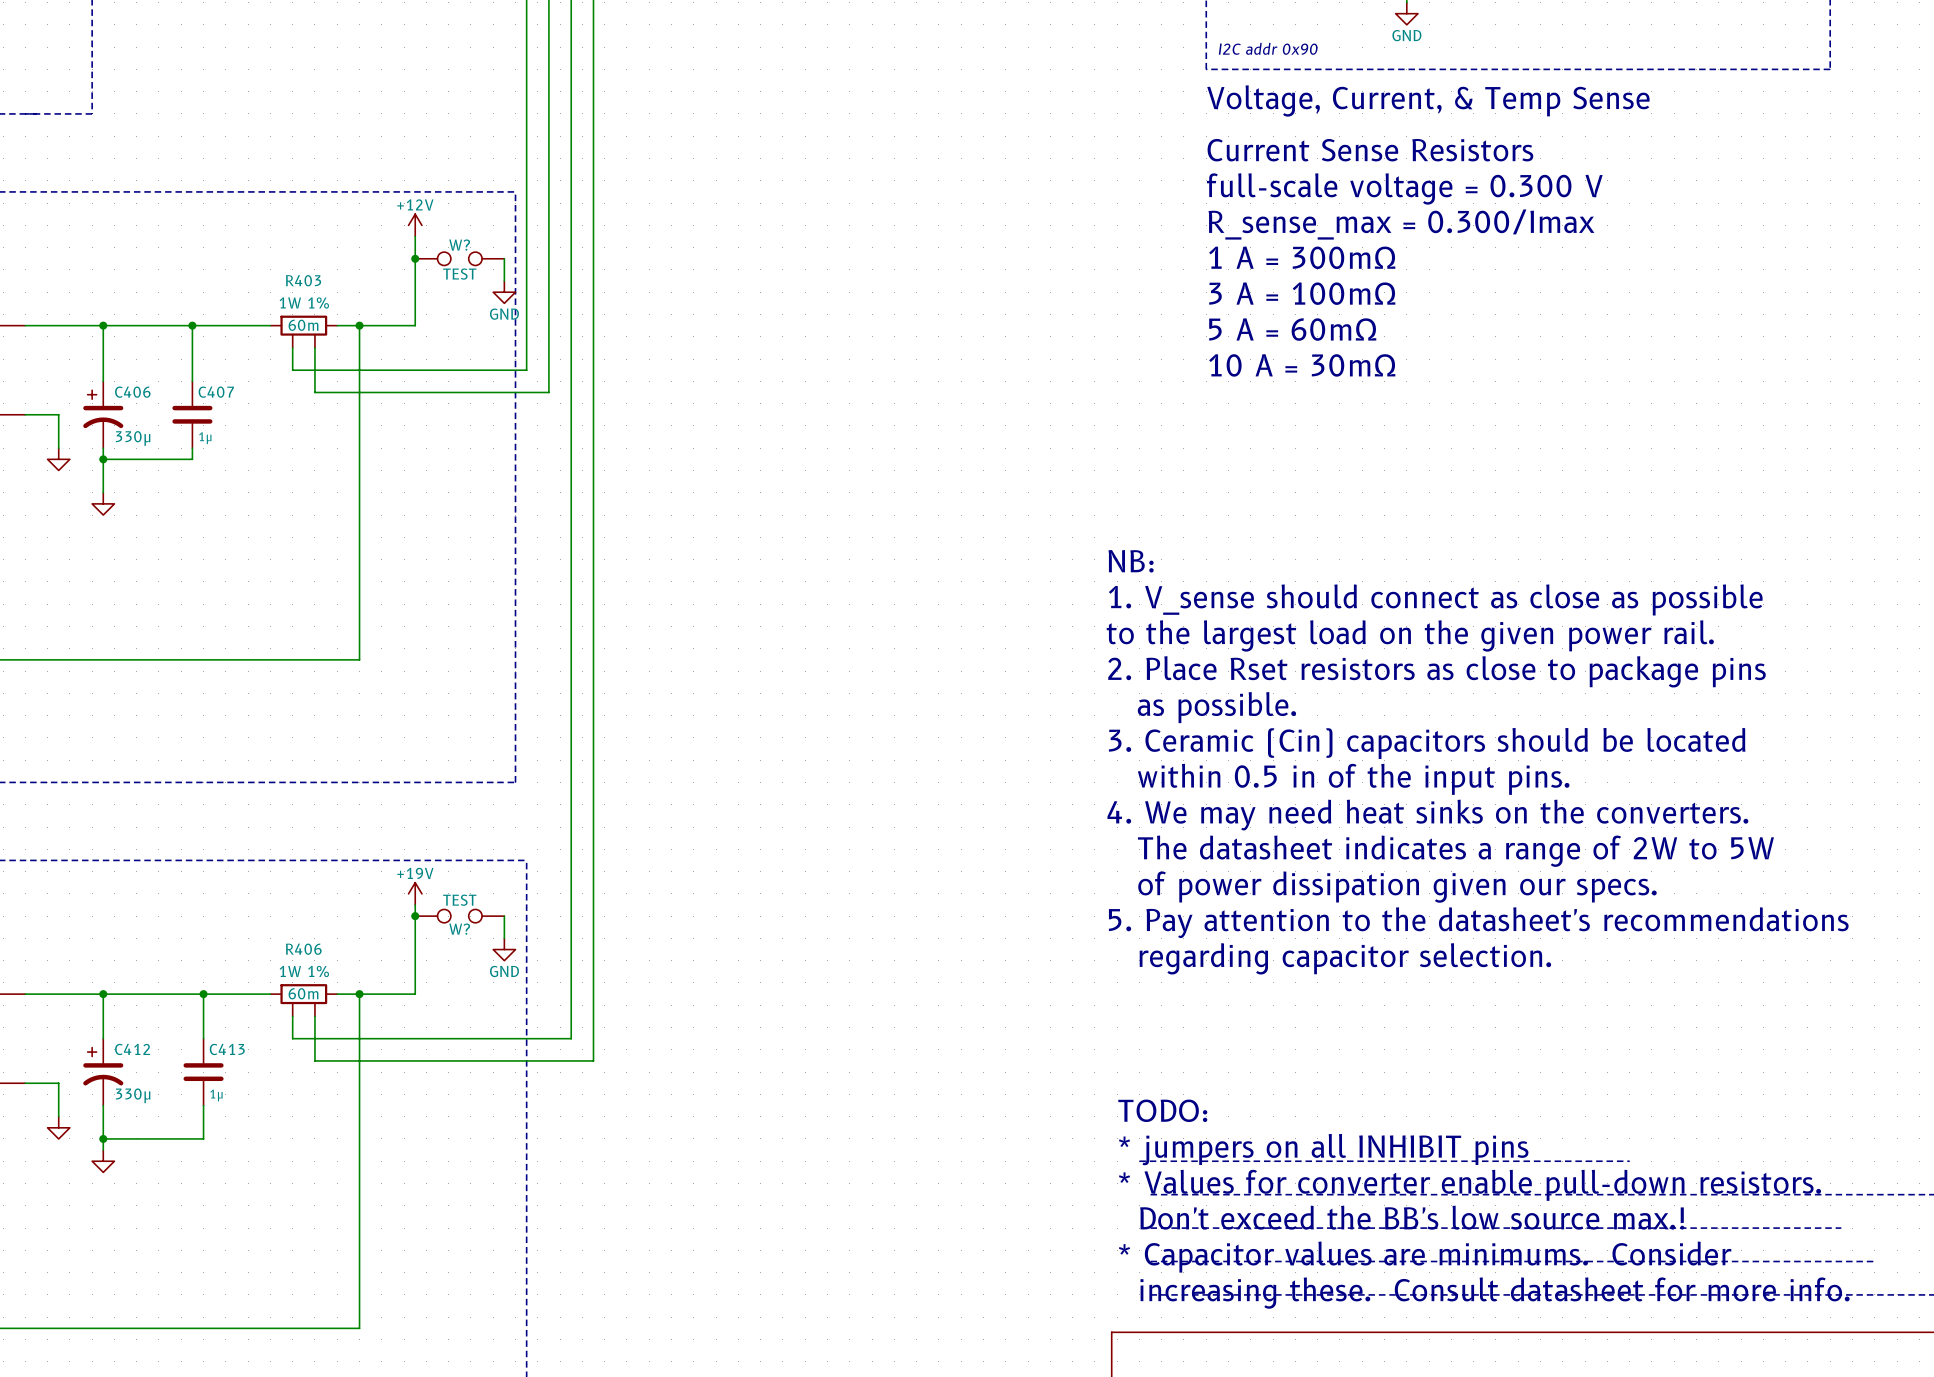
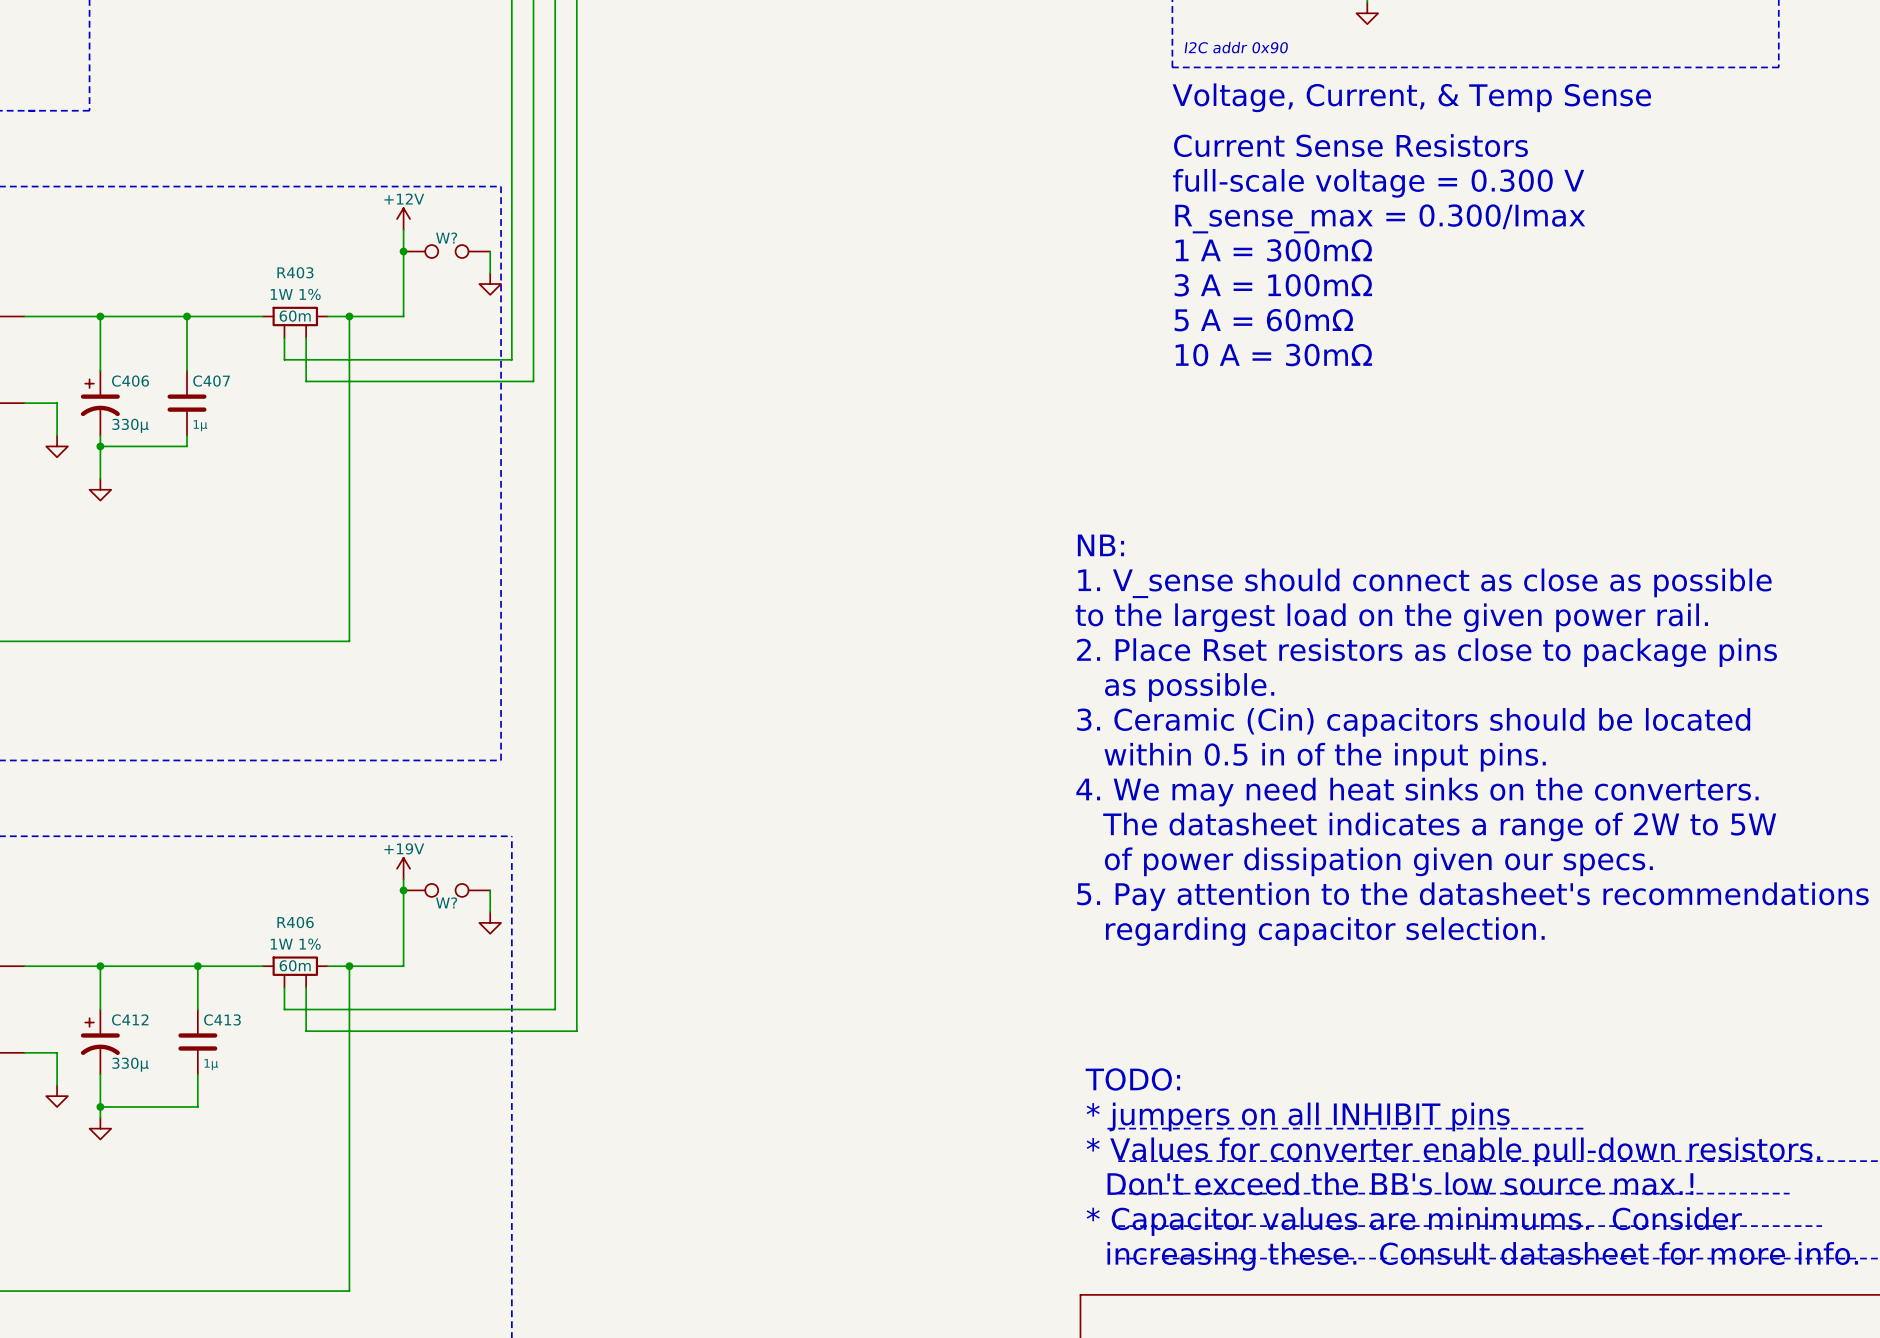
power symbol text: GND (1406, 35) -> none
W? value: TEST (459, 274) -> none
power symbol text: GND (504, 314) -> none
W? value: TEST (459, 900) -> none
power symbol text: GND (504, 971) -> none

